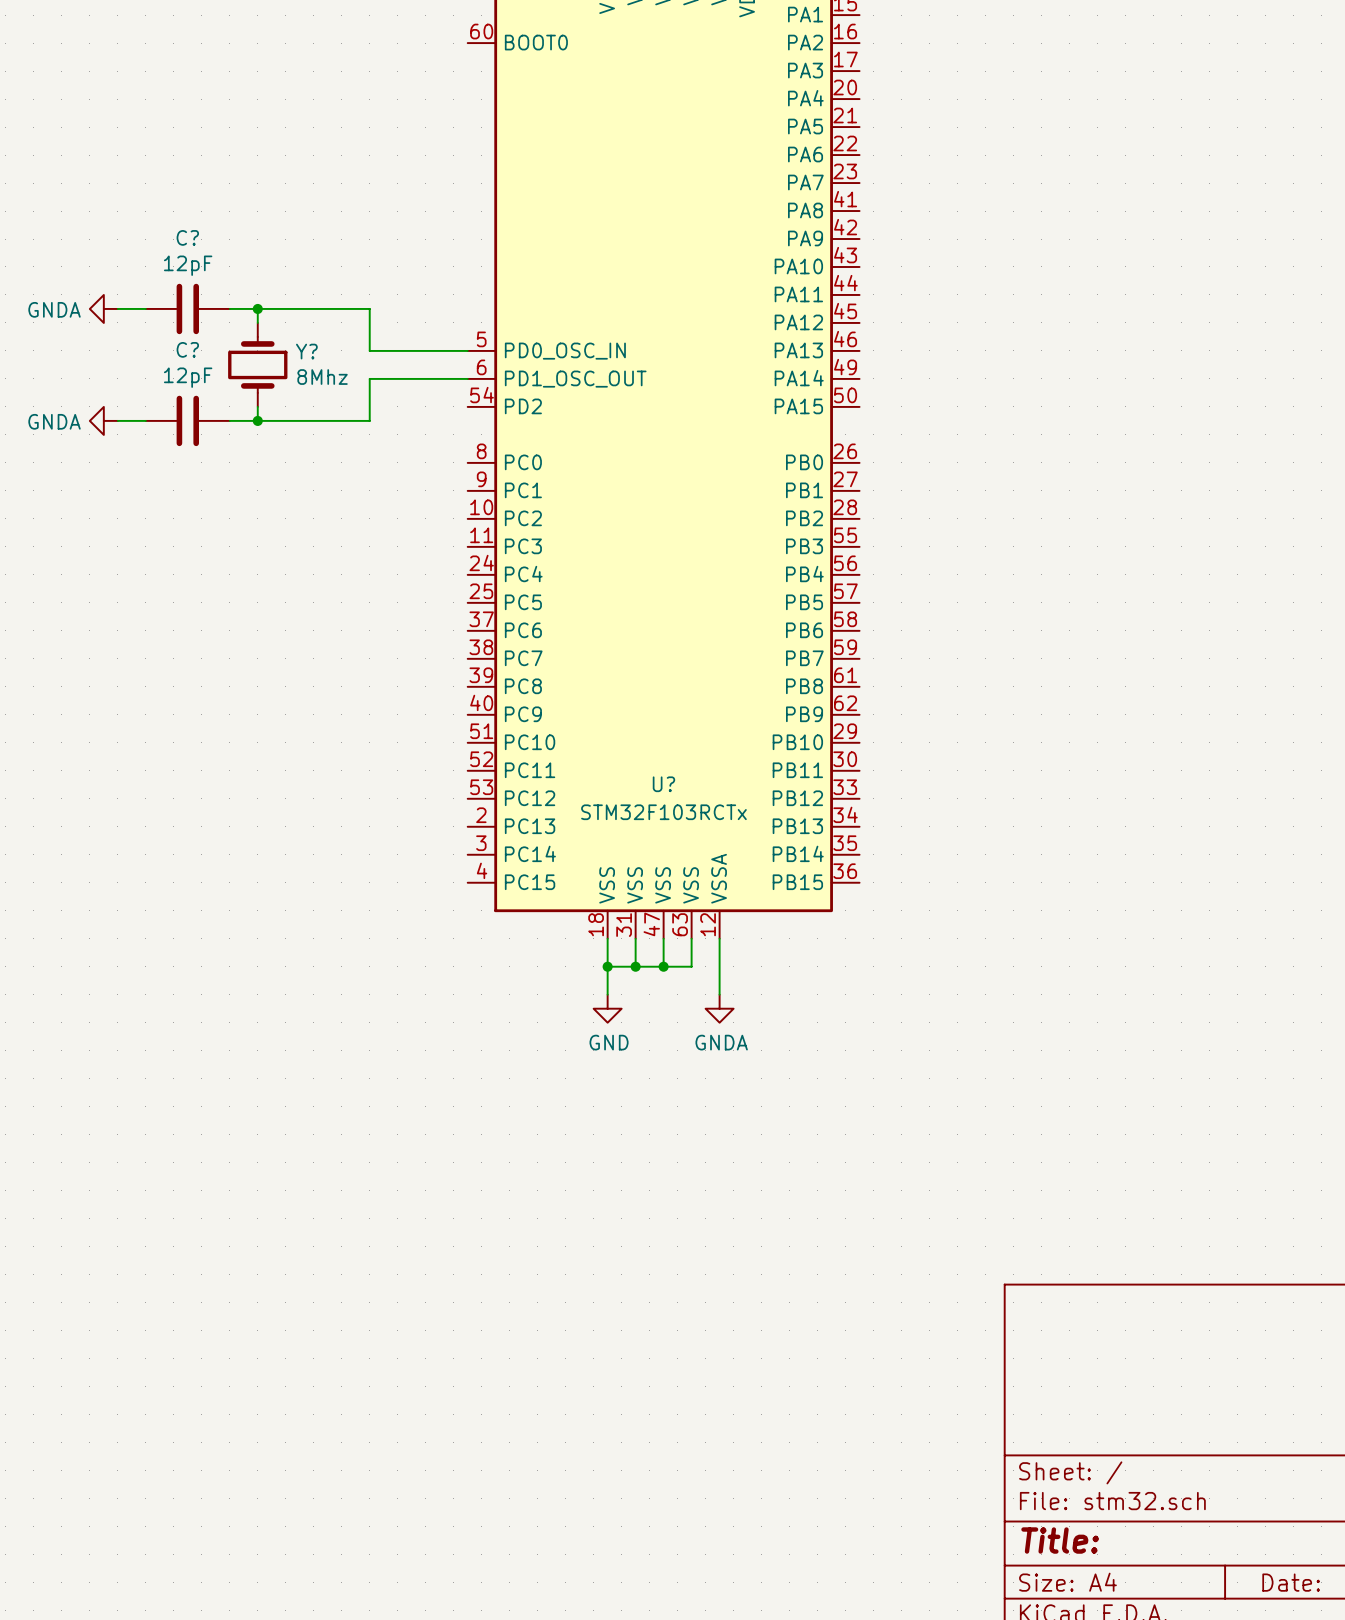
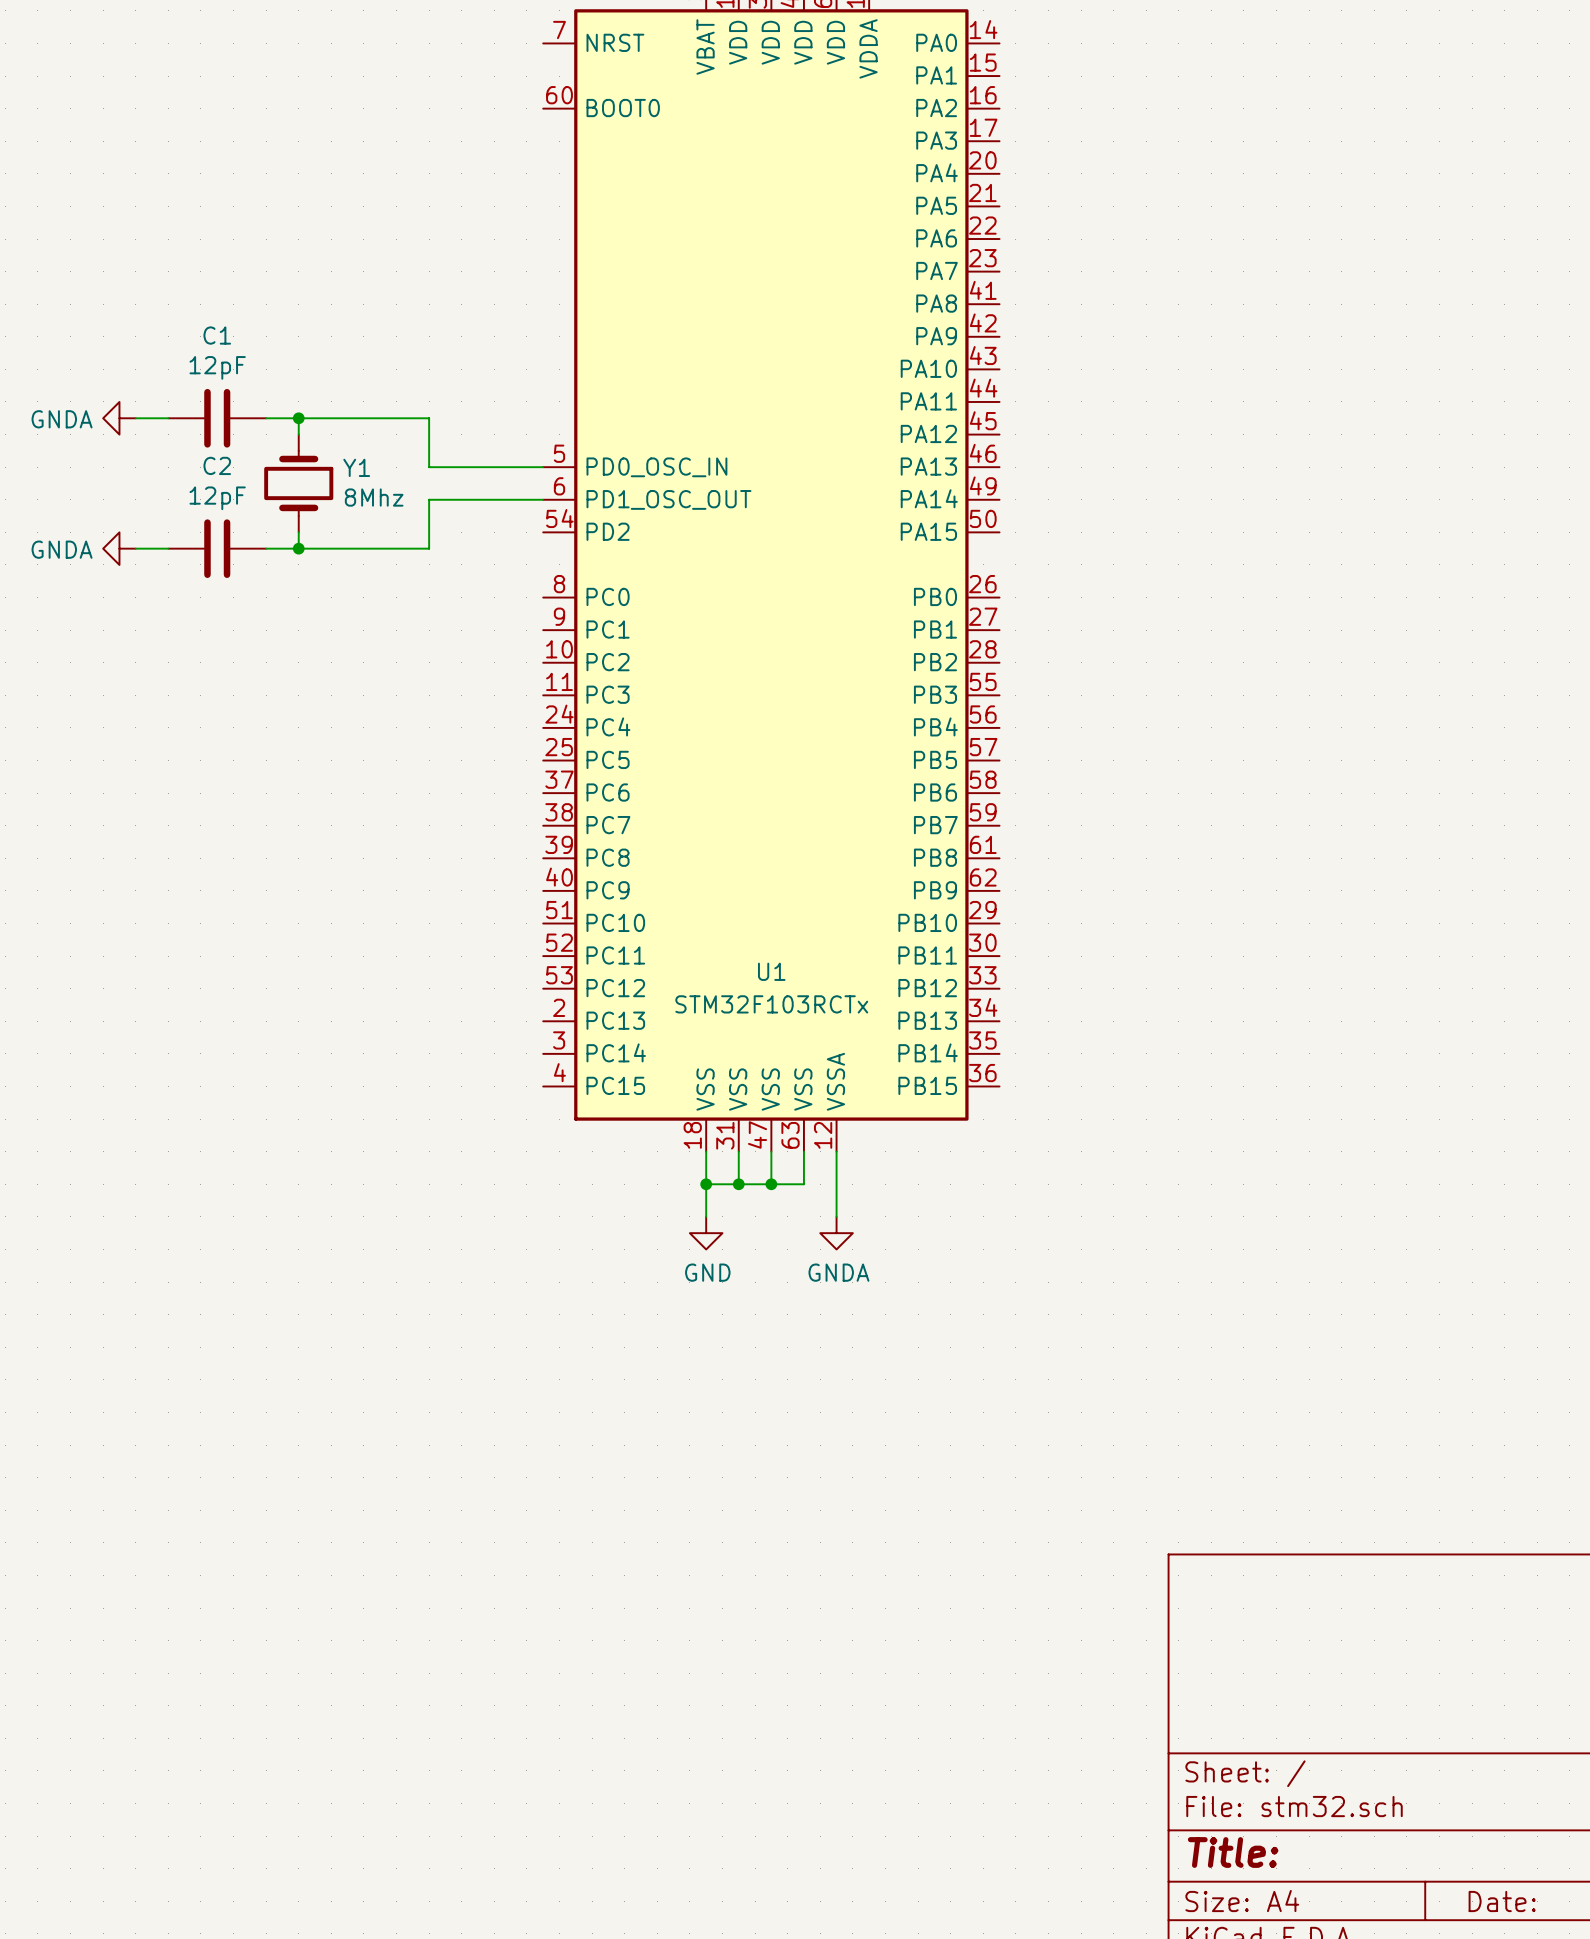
C? name: C? (187, 237) -> C1 (217, 335)
C? name: C? (187, 349) -> C2 (217, 465)
Y? name: Y? (306, 351) -> Y1 (356, 467)
U? name: U? (663, 784) -> U1 (771, 971)

